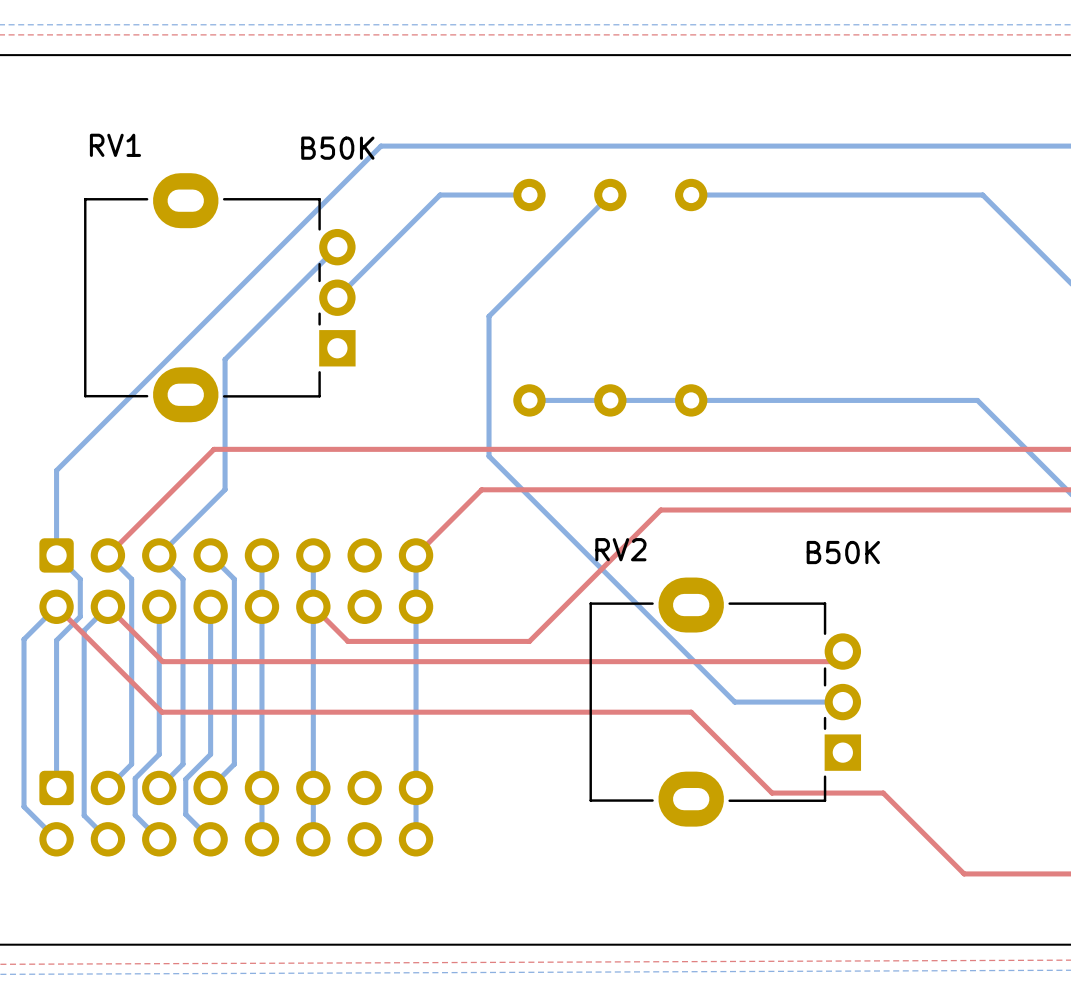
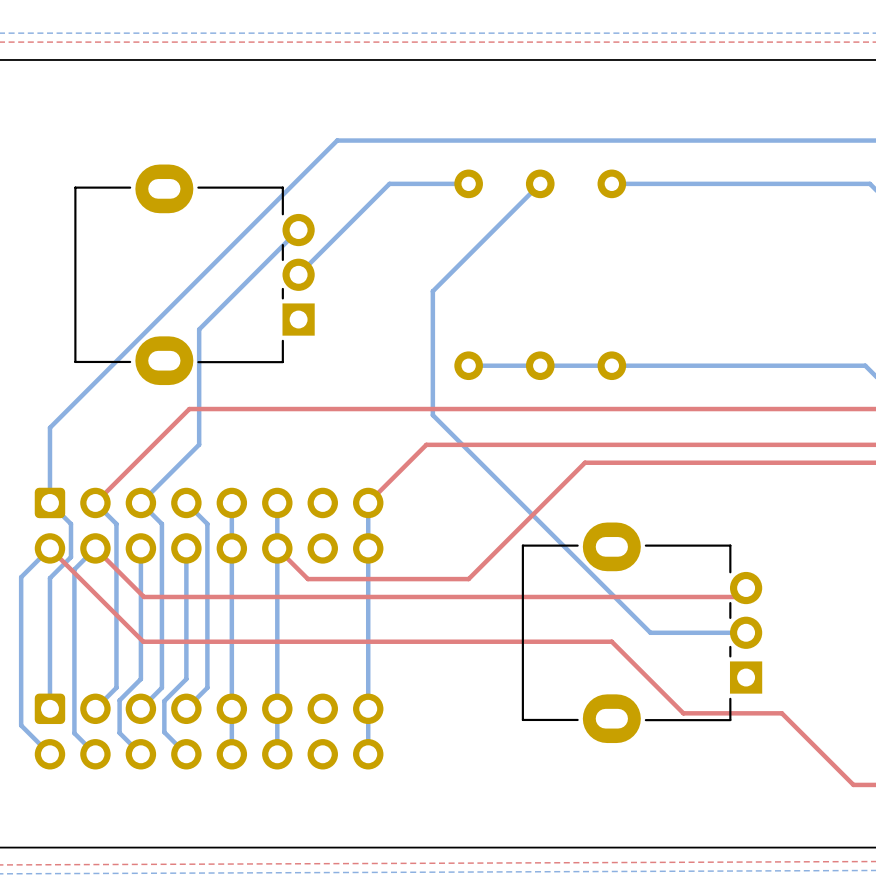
RV1 name: RV1 (115, 145) -> none
RV1 value: B50K (337, 148) -> none
RV2 name: RV2 (620, 549) -> none
RV2 value: B50K (843, 552) -> none

